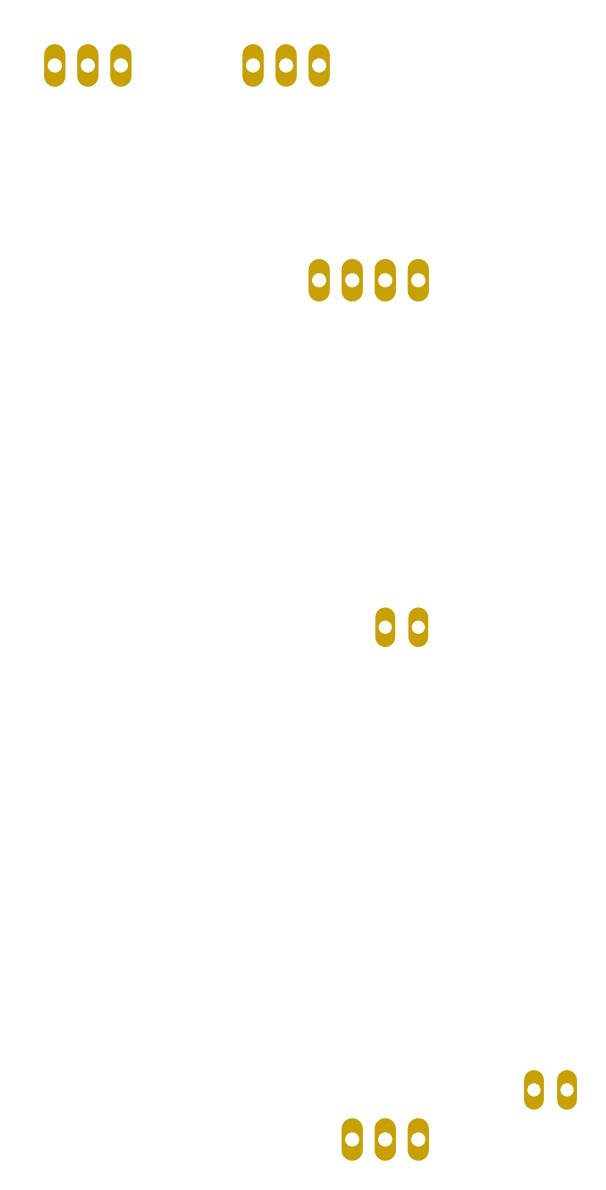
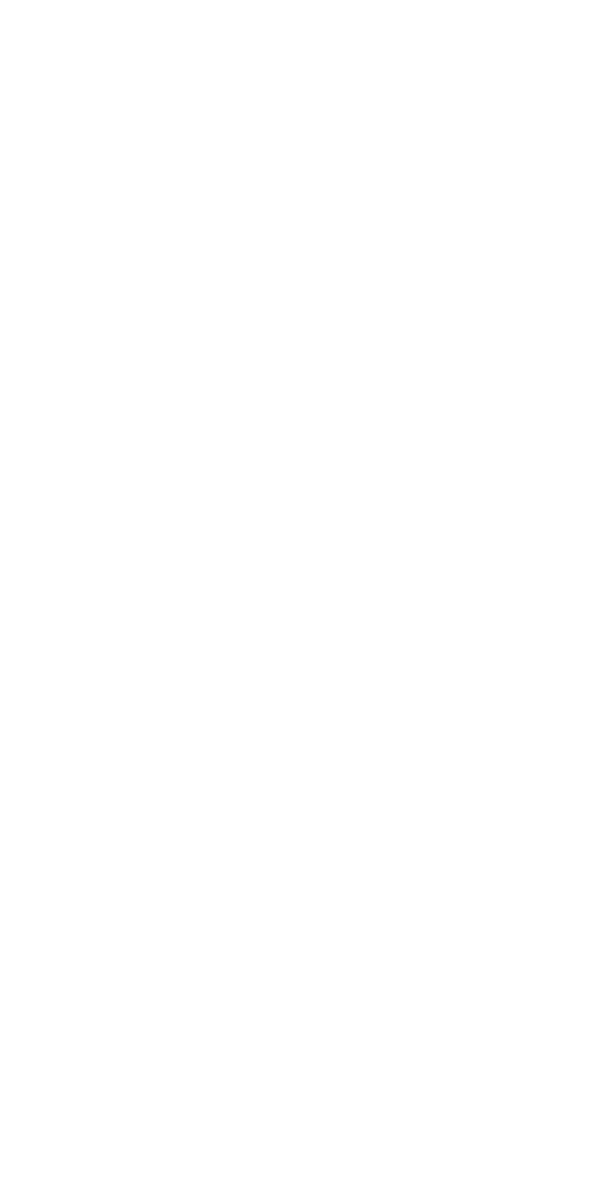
part: (87, 65) -> none
part: (286, 65) -> none
part: (368, 280) -> none
part: (401, 627) -> none
part: (550, 1089) -> none
part: (385, 1139) -> none

